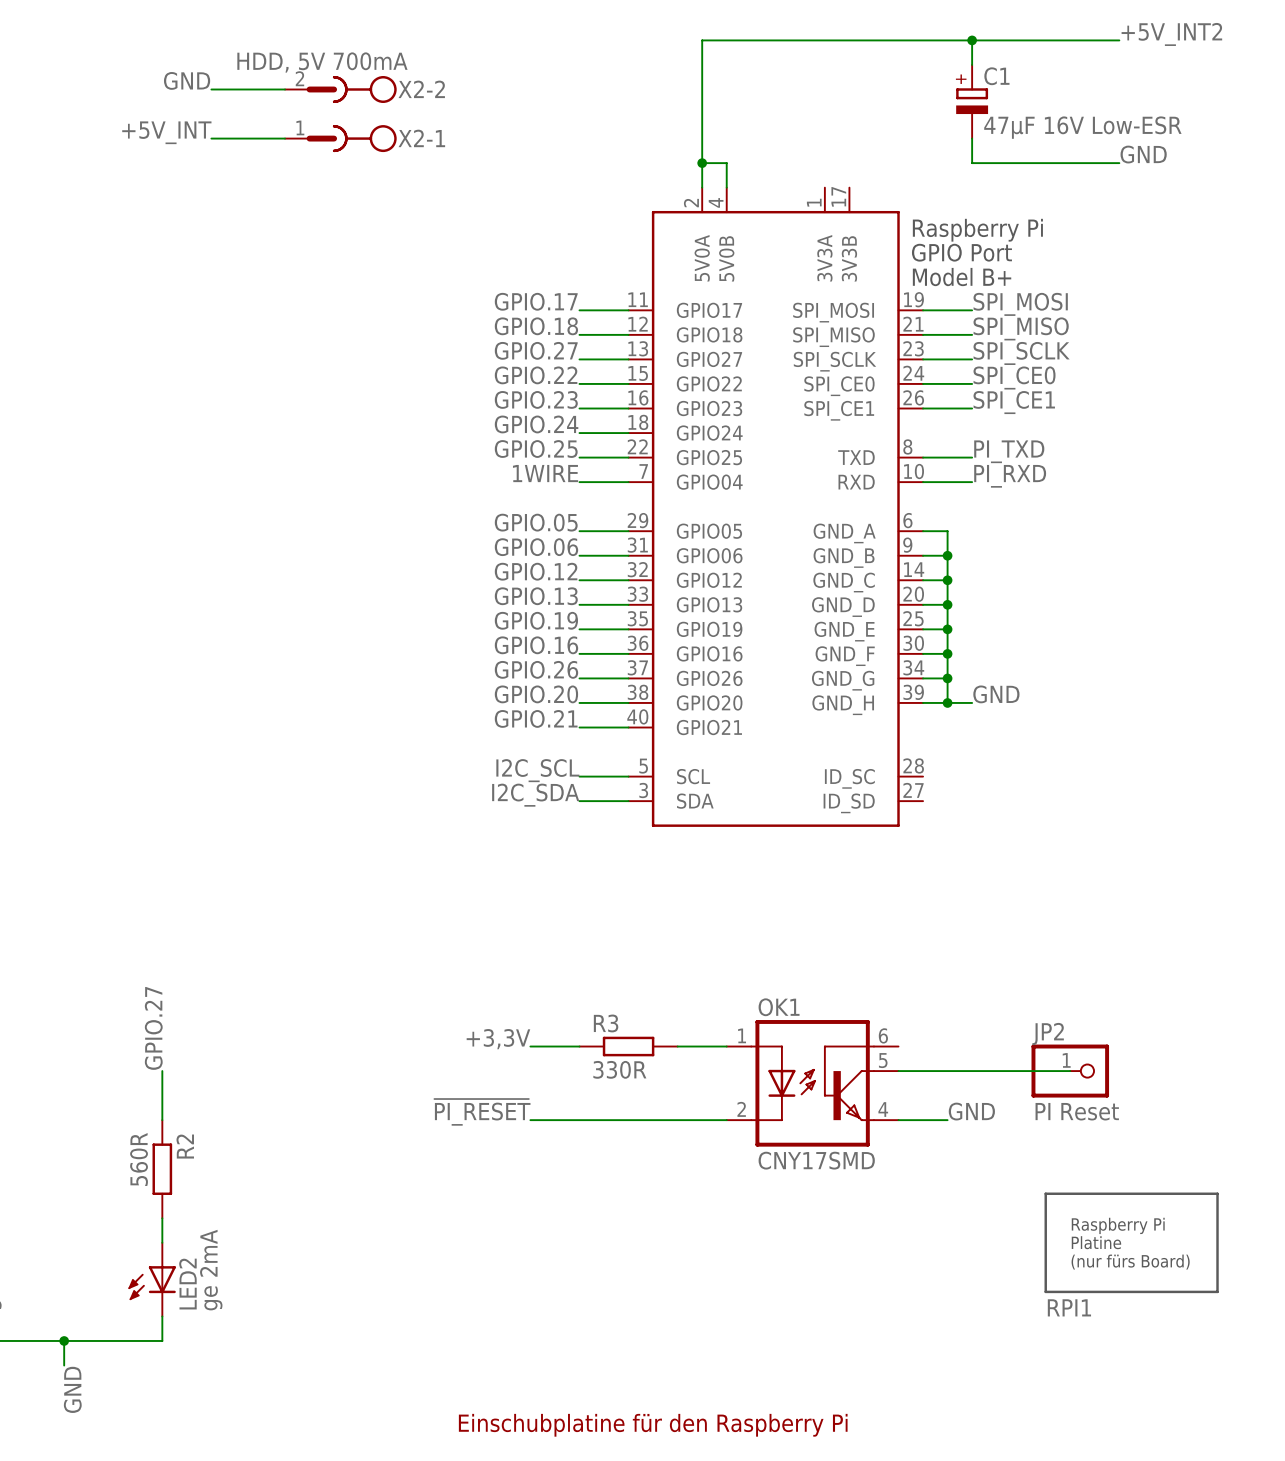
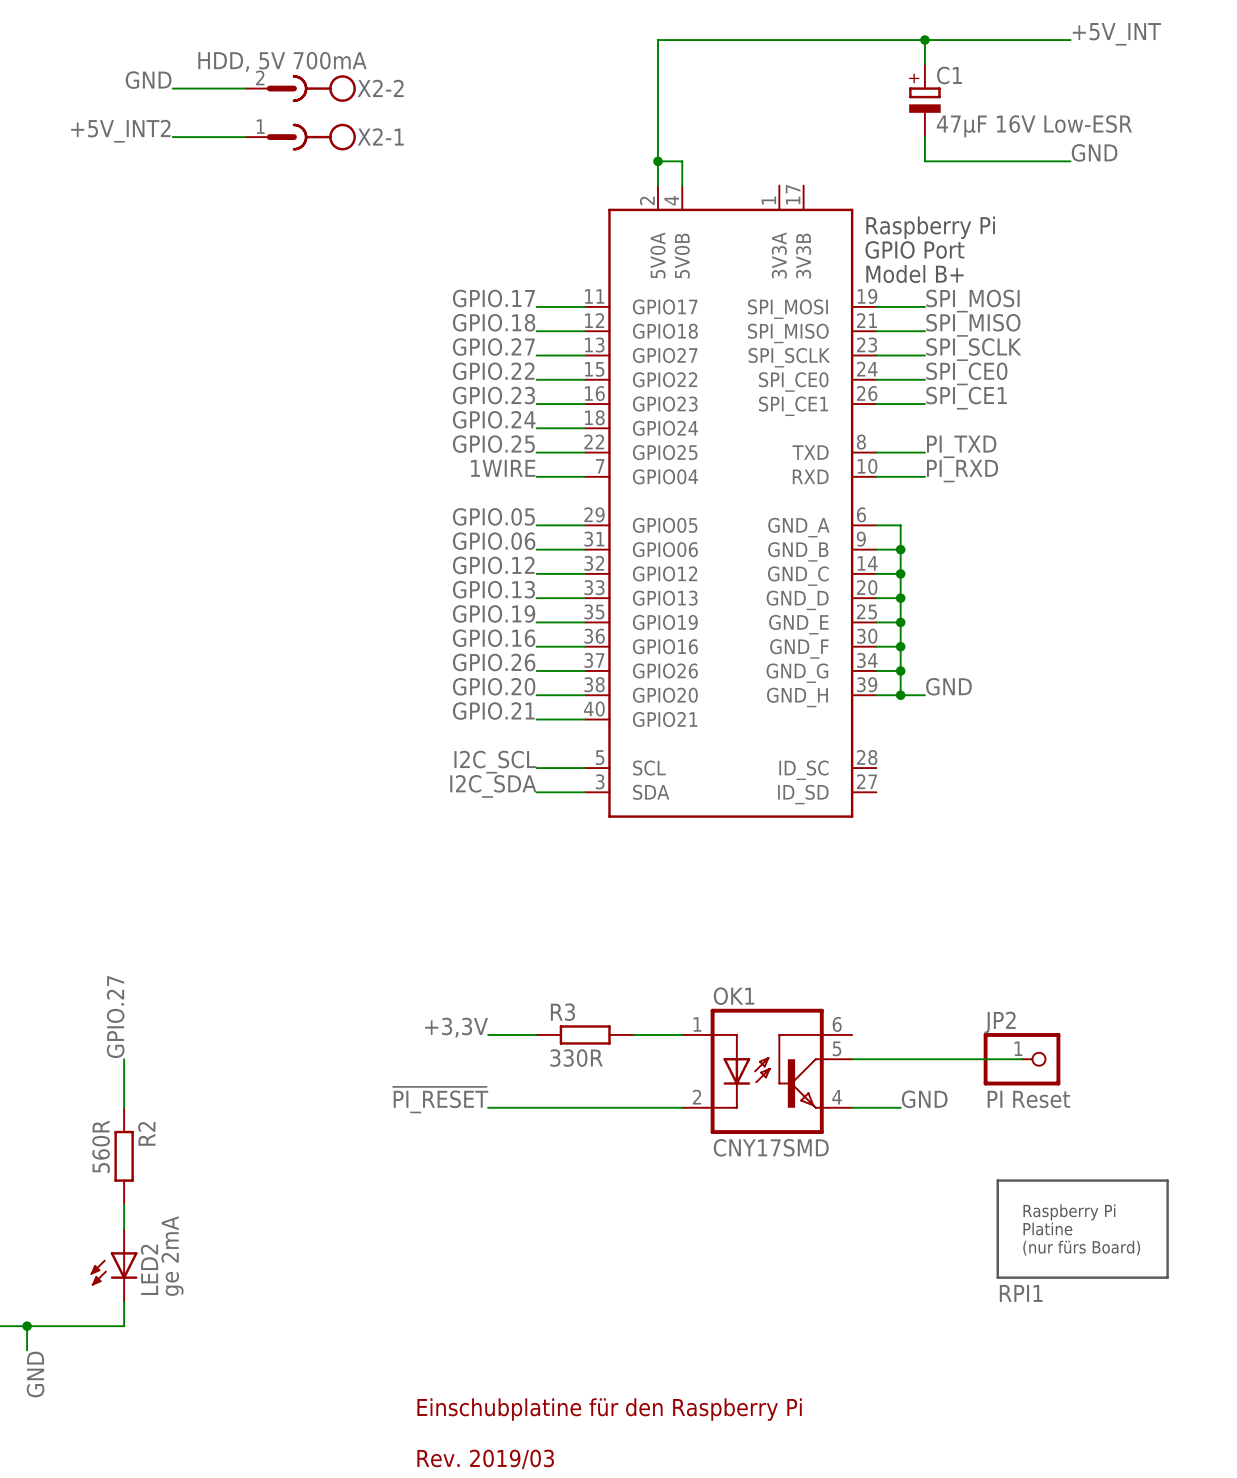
label: +5V_INT2 (1171, 34) -> +5V_INT (1116, 34)
label: +5V_INT (166, 132) -> +5V_INT2 (120, 131)

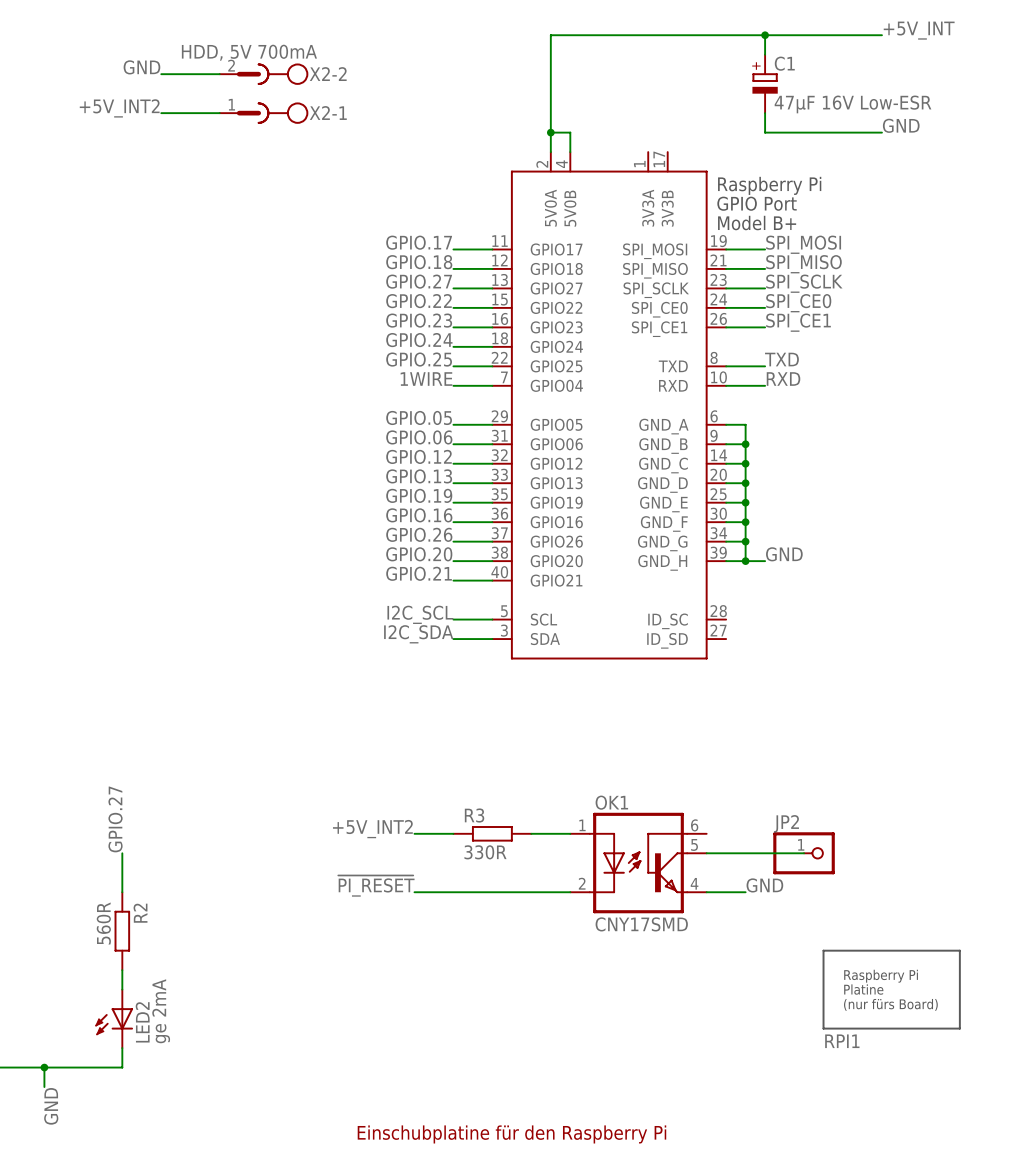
label: PI_TXD (961, 446) -> TXD (781, 359)
label: PI_RXD (962, 471) -> RXD (783, 379)
label: +3,3V (456, 1027) -> +5V_INT2 (372, 829)
wire: (973, 1059) (1022, 1059) -> none
JP2 position: (1022, 1059) -> (804, 853)
JP2 value: PI Reset (1028, 1099) -> none

